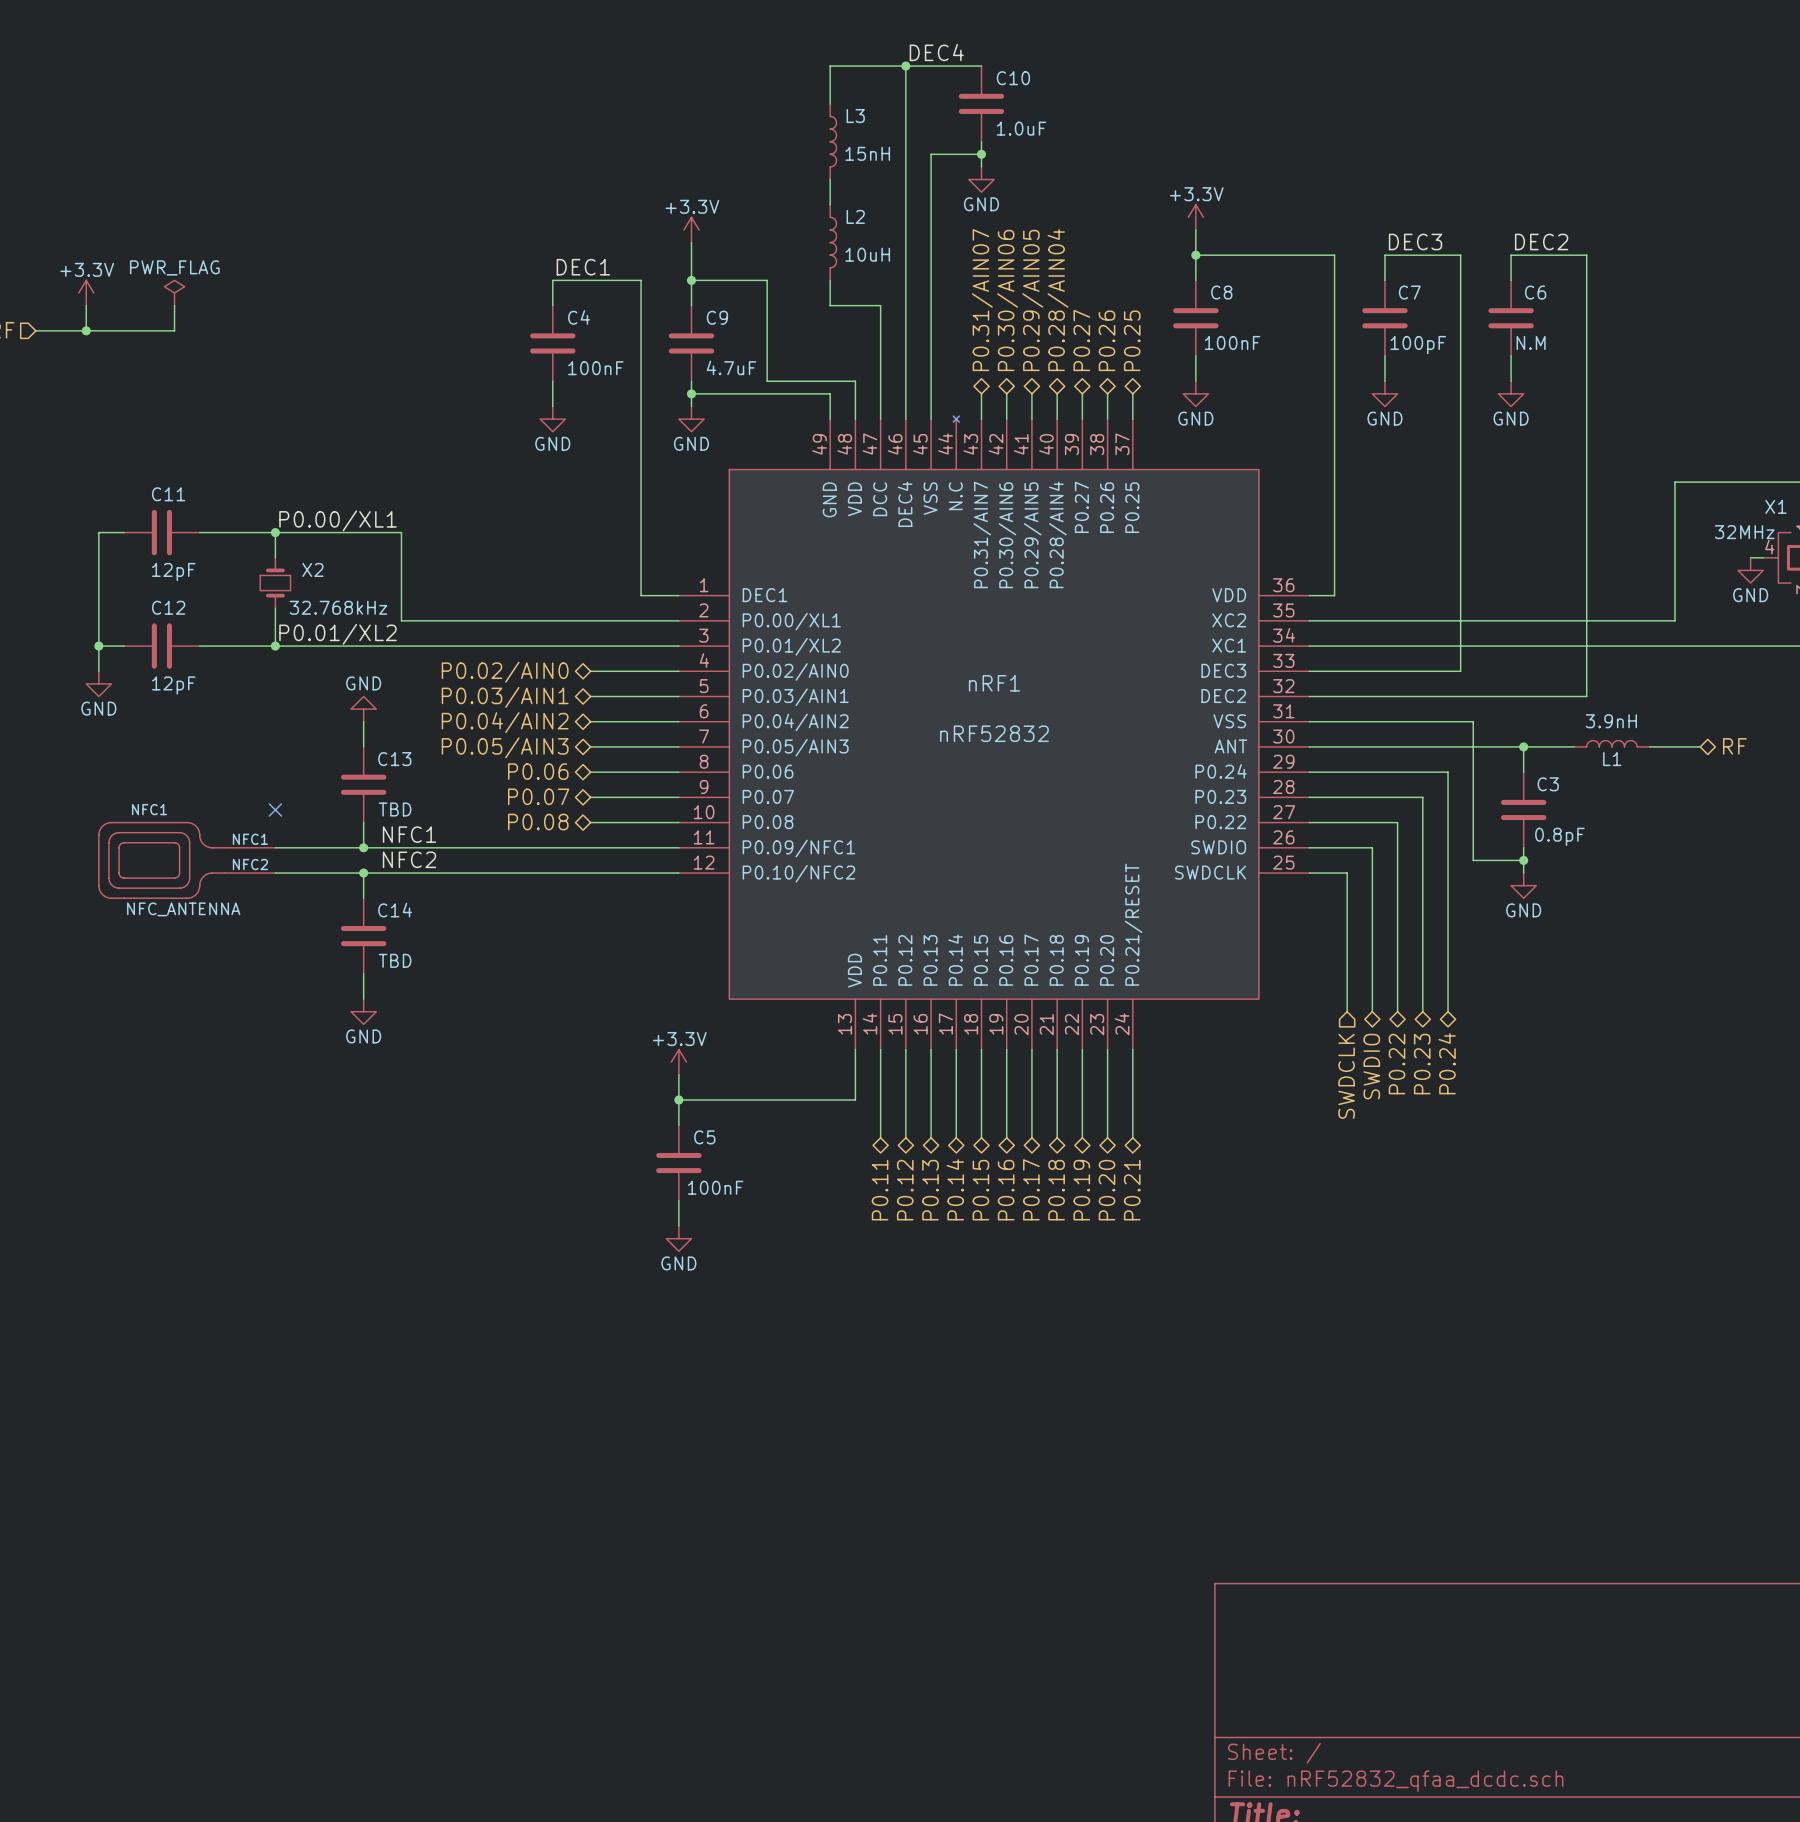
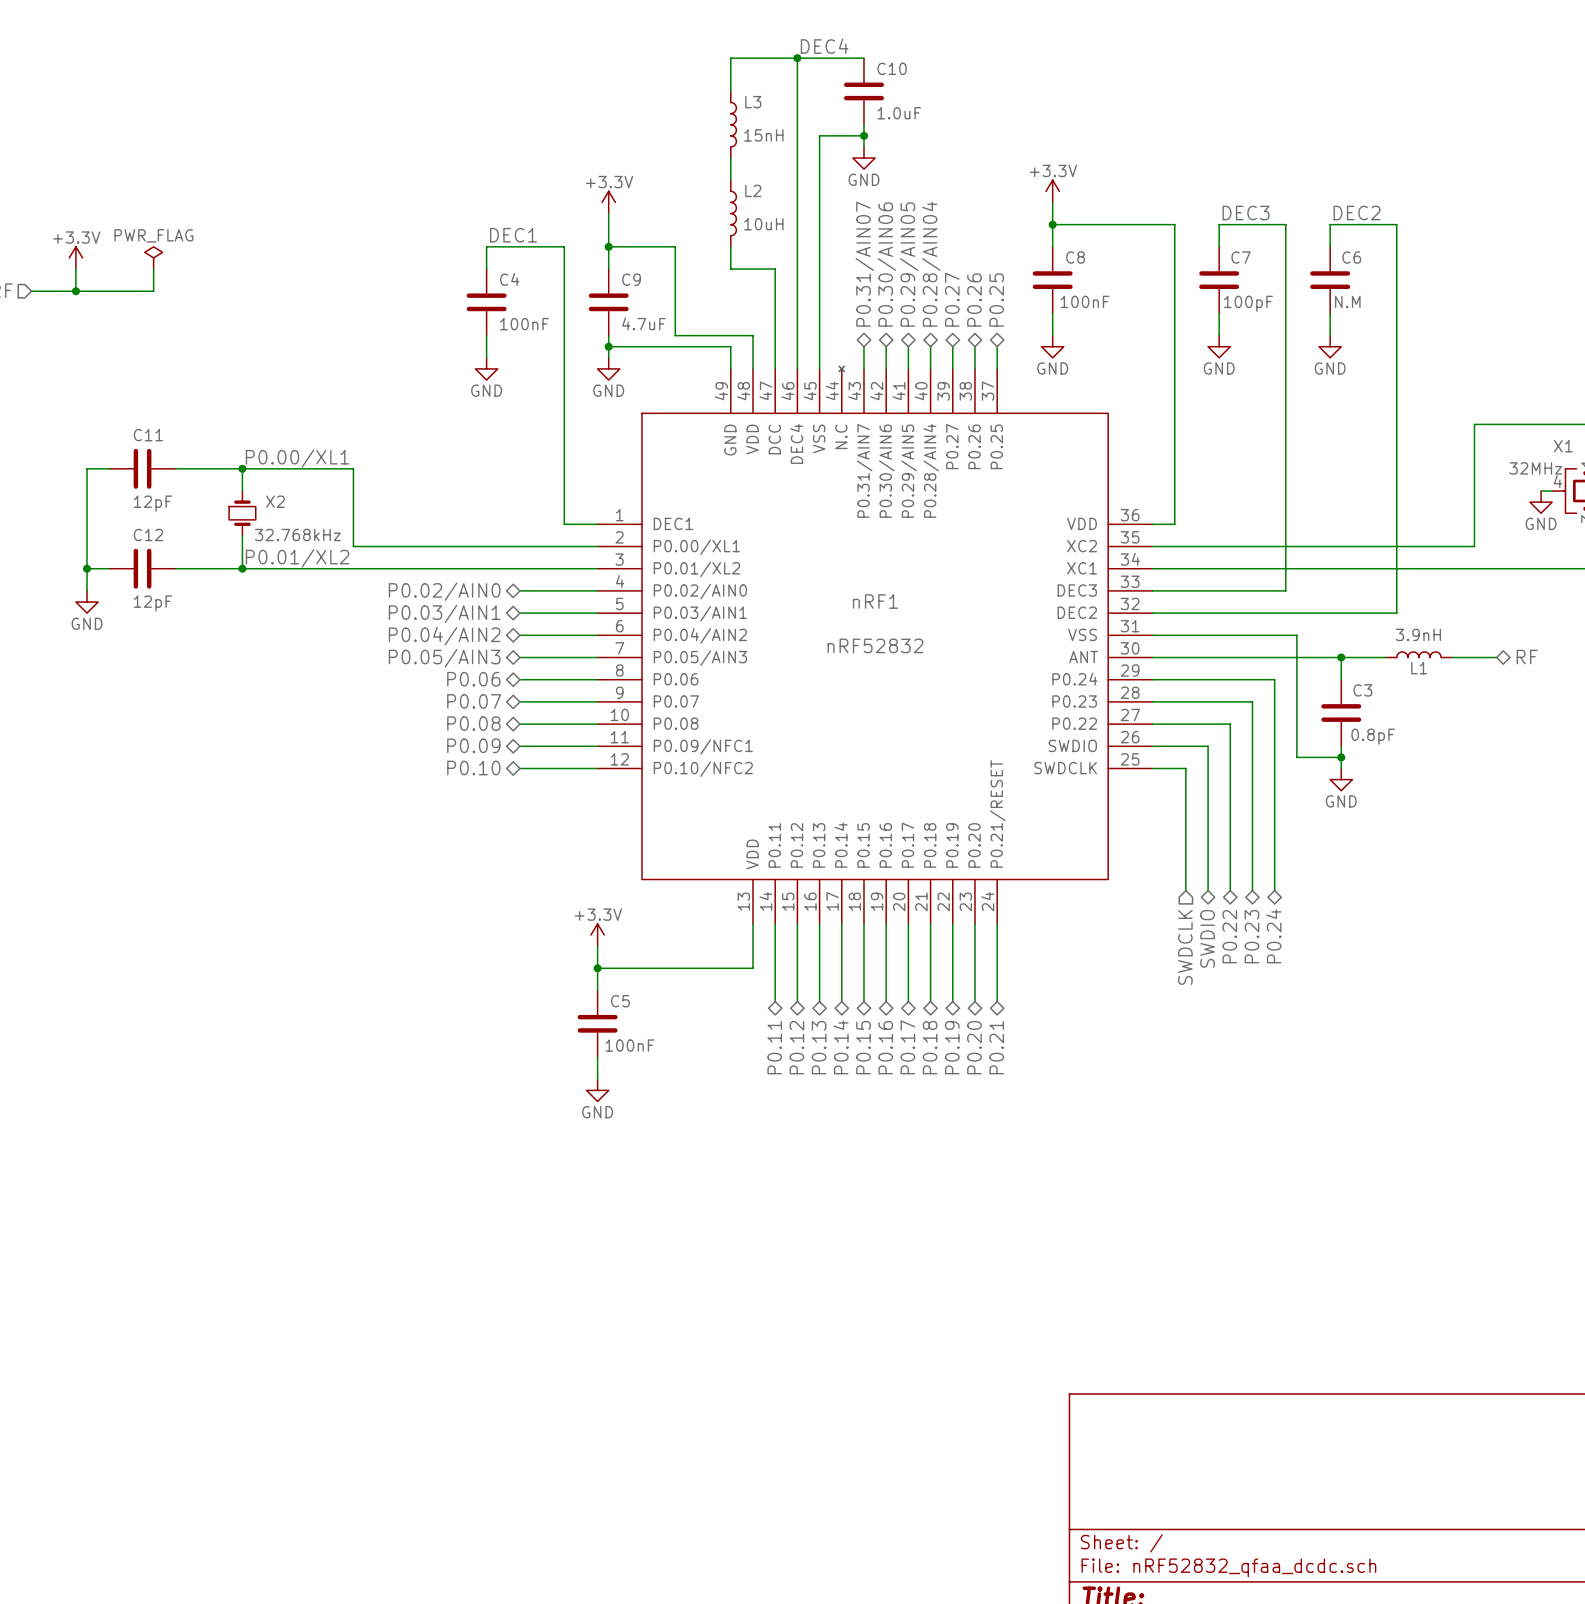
power symbol: GND (363, 709) -> none
wire: (363, 721) (363, 746) -> none
C13: TBD (363, 784) -> none
no-connect mark: (275, 809) -> none
wire: (363, 822) (363, 847) -> none
label: NFC1 (409, 834) -> none
wire: (275, 847) (590, 847) -> none
junction: (363, 847) -> none
hierarchical label: none -> P0.09 (473, 745)
label: NFC2 (409, 859) -> none
NFC1: NFC_ANTENNA (187, 860) -> none
hierarchical label: none -> P0.10 (473, 768)
wire: (275, 873) (590, 873) -> none
wire: (363, 873) (363, 898) -> none
junction: (363, 873) -> none
C14: TBD (363, 936) -> none
wire: (363, 973) (363, 999) -> none
power symbol: GND (363, 1011) -> none

